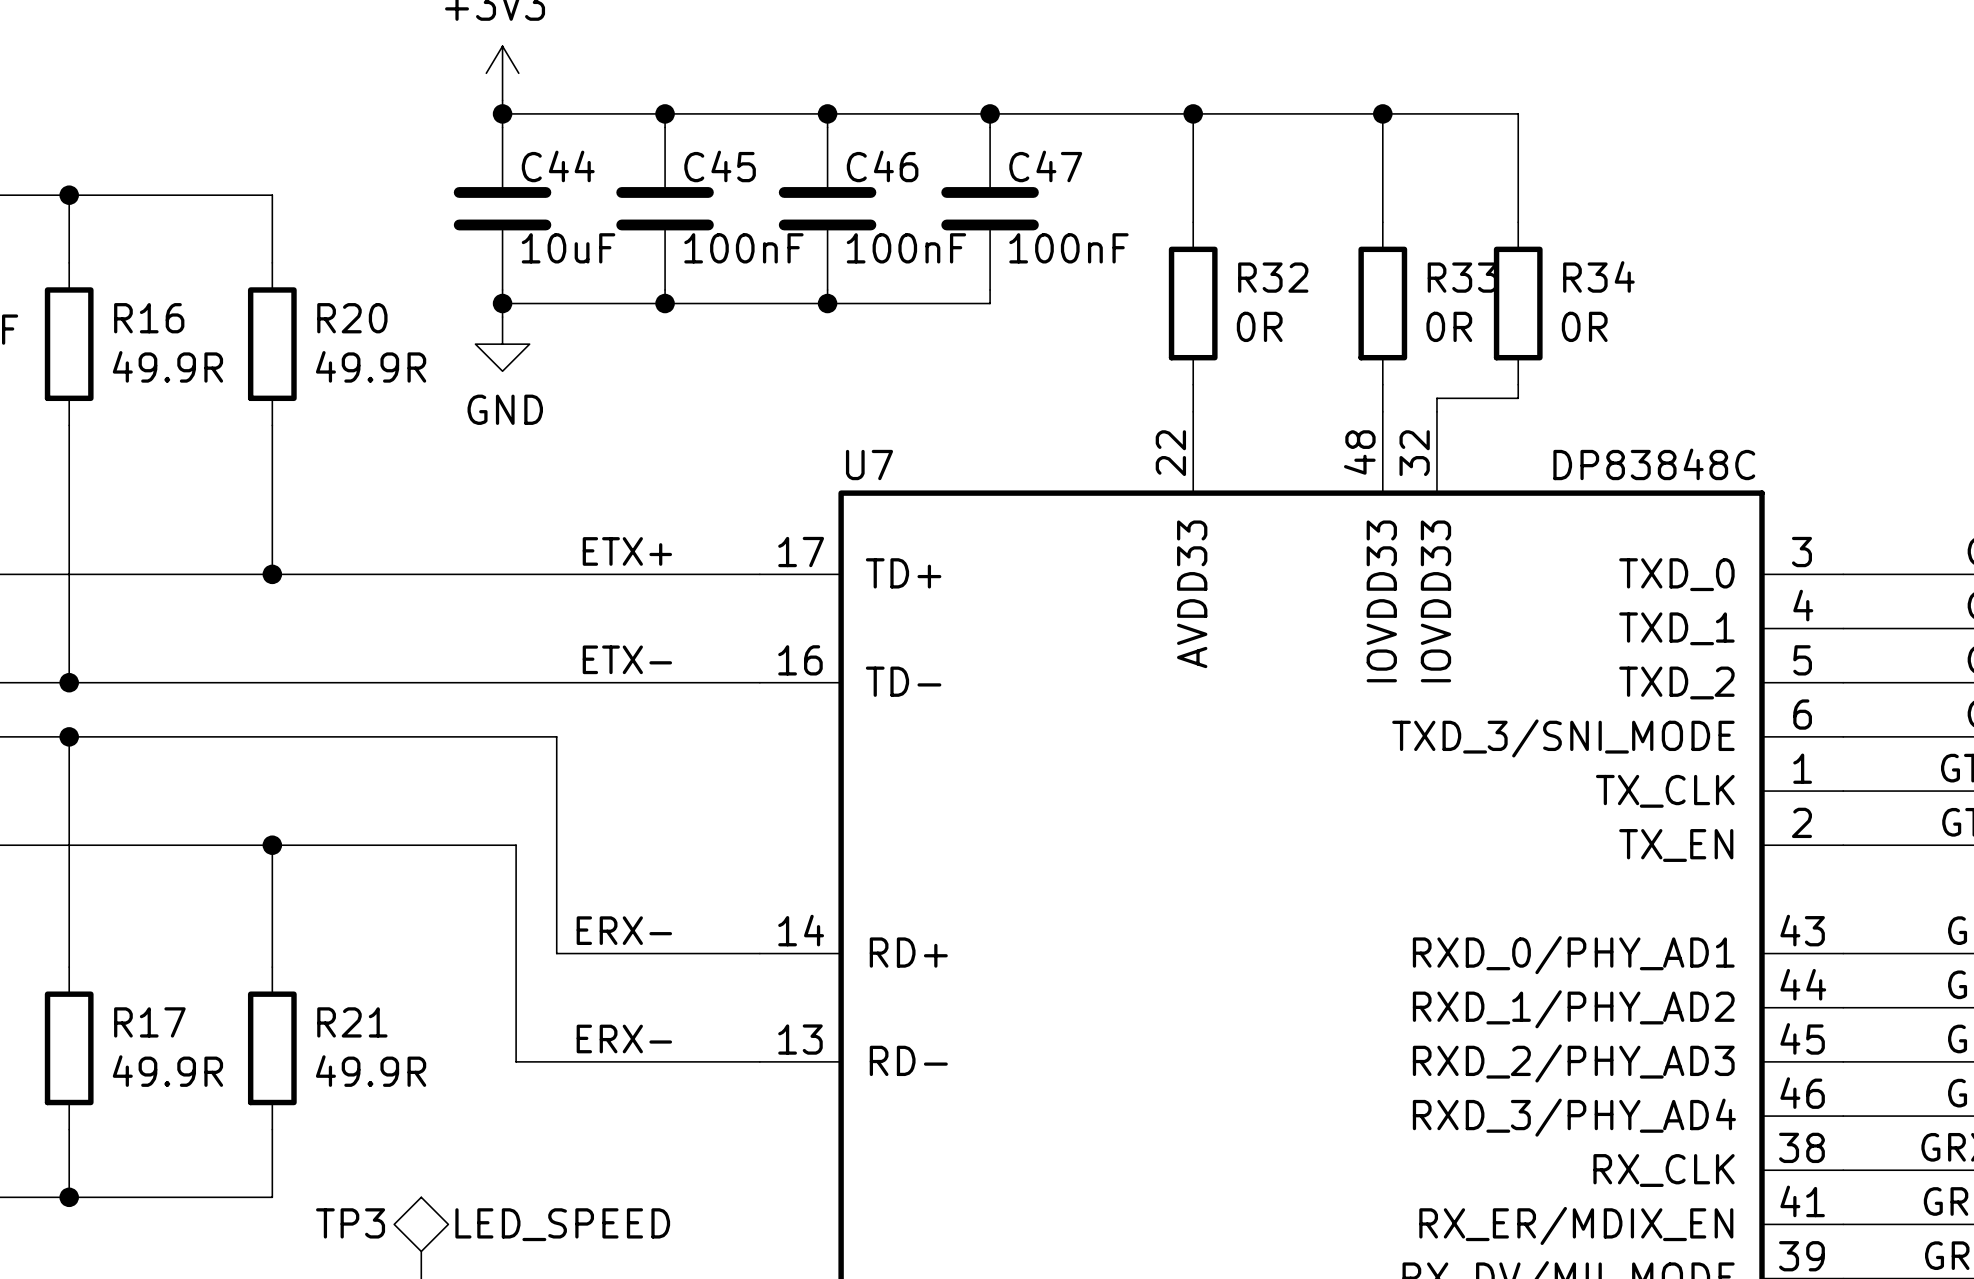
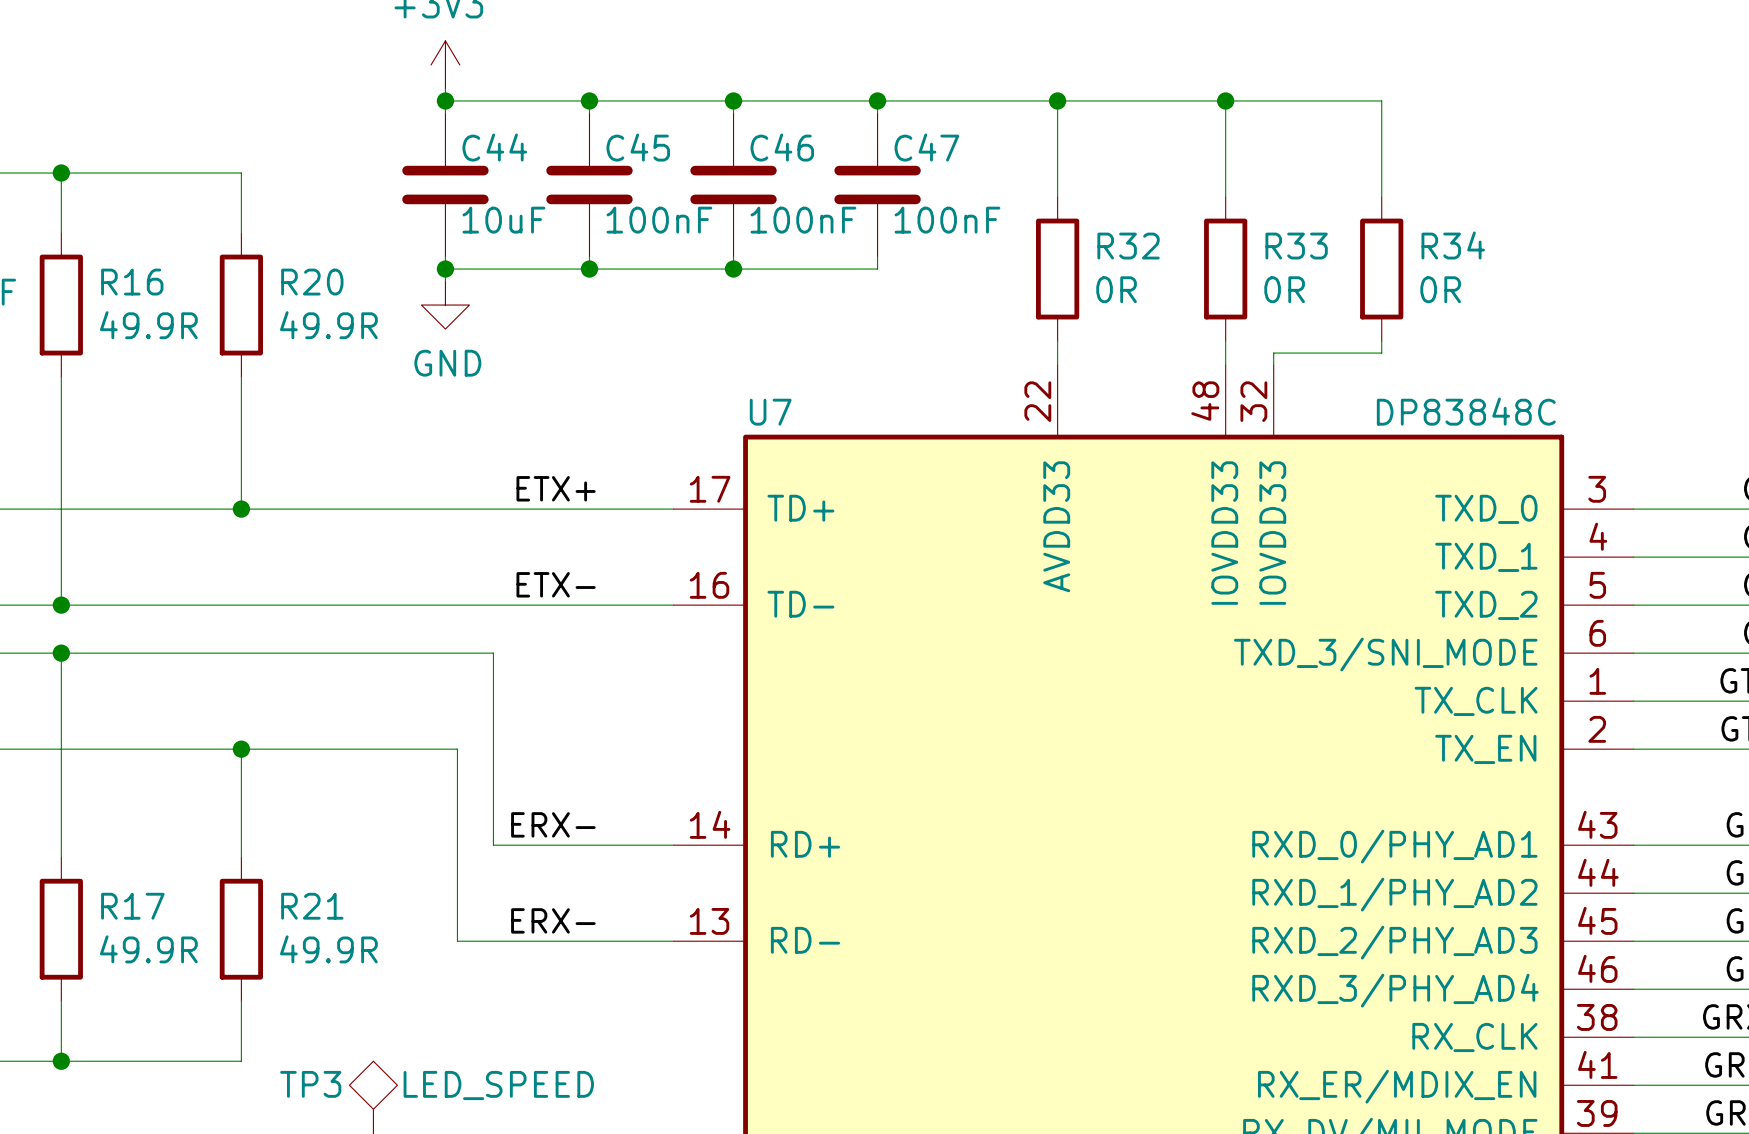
wire: (1518, 113) (1518, 222) -> (1345, 100) (1381, 100) (1381, 197)
R34 position: (1518, 303) -> (1381, 269)
wire: (1518, 384) (1518, 398) -> (1381, 341) (1381, 353) (1345, 353)

